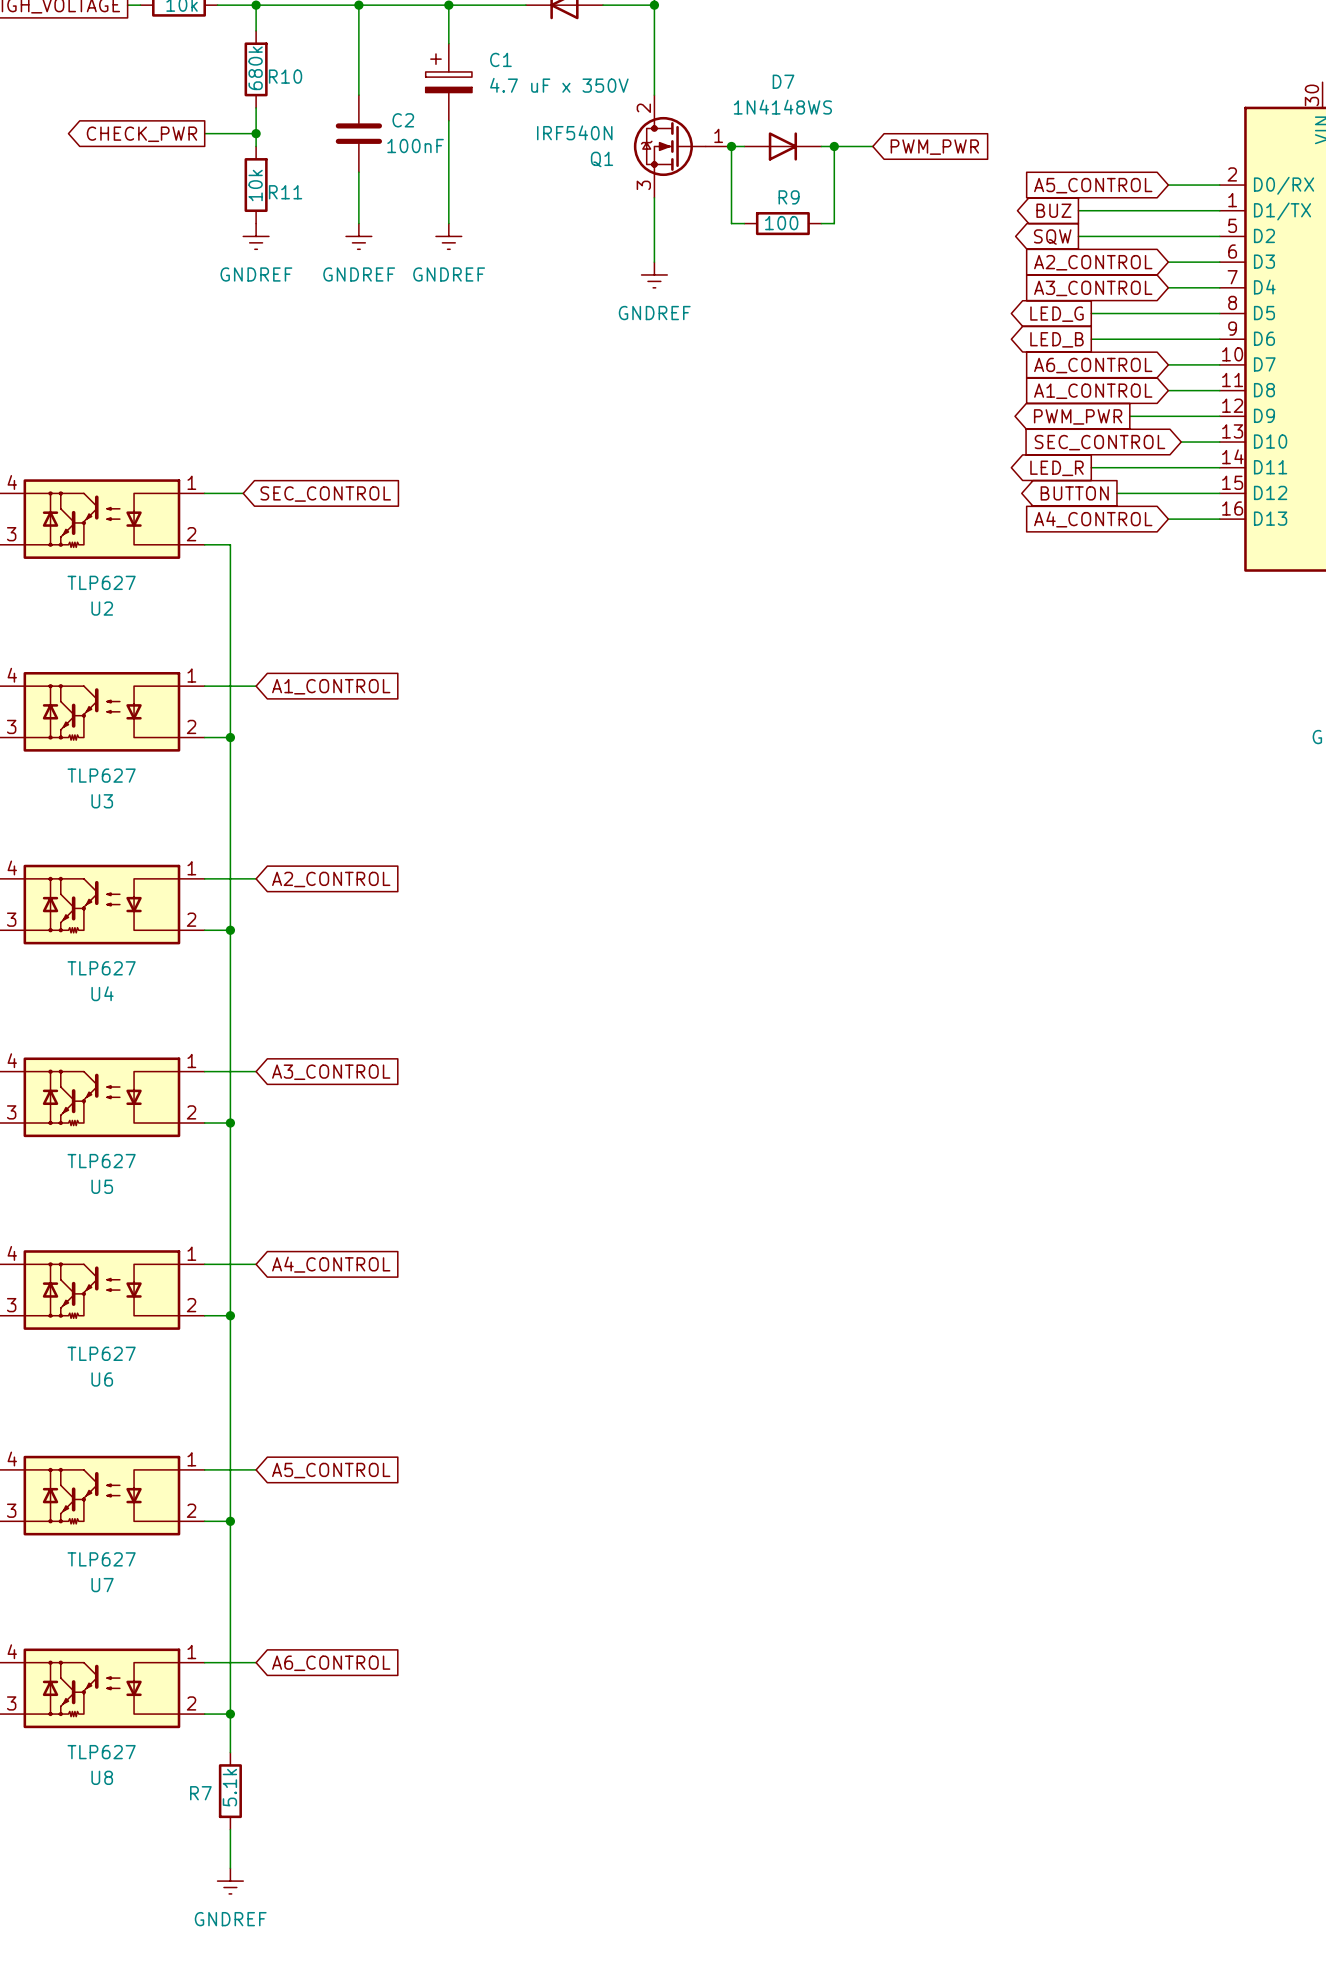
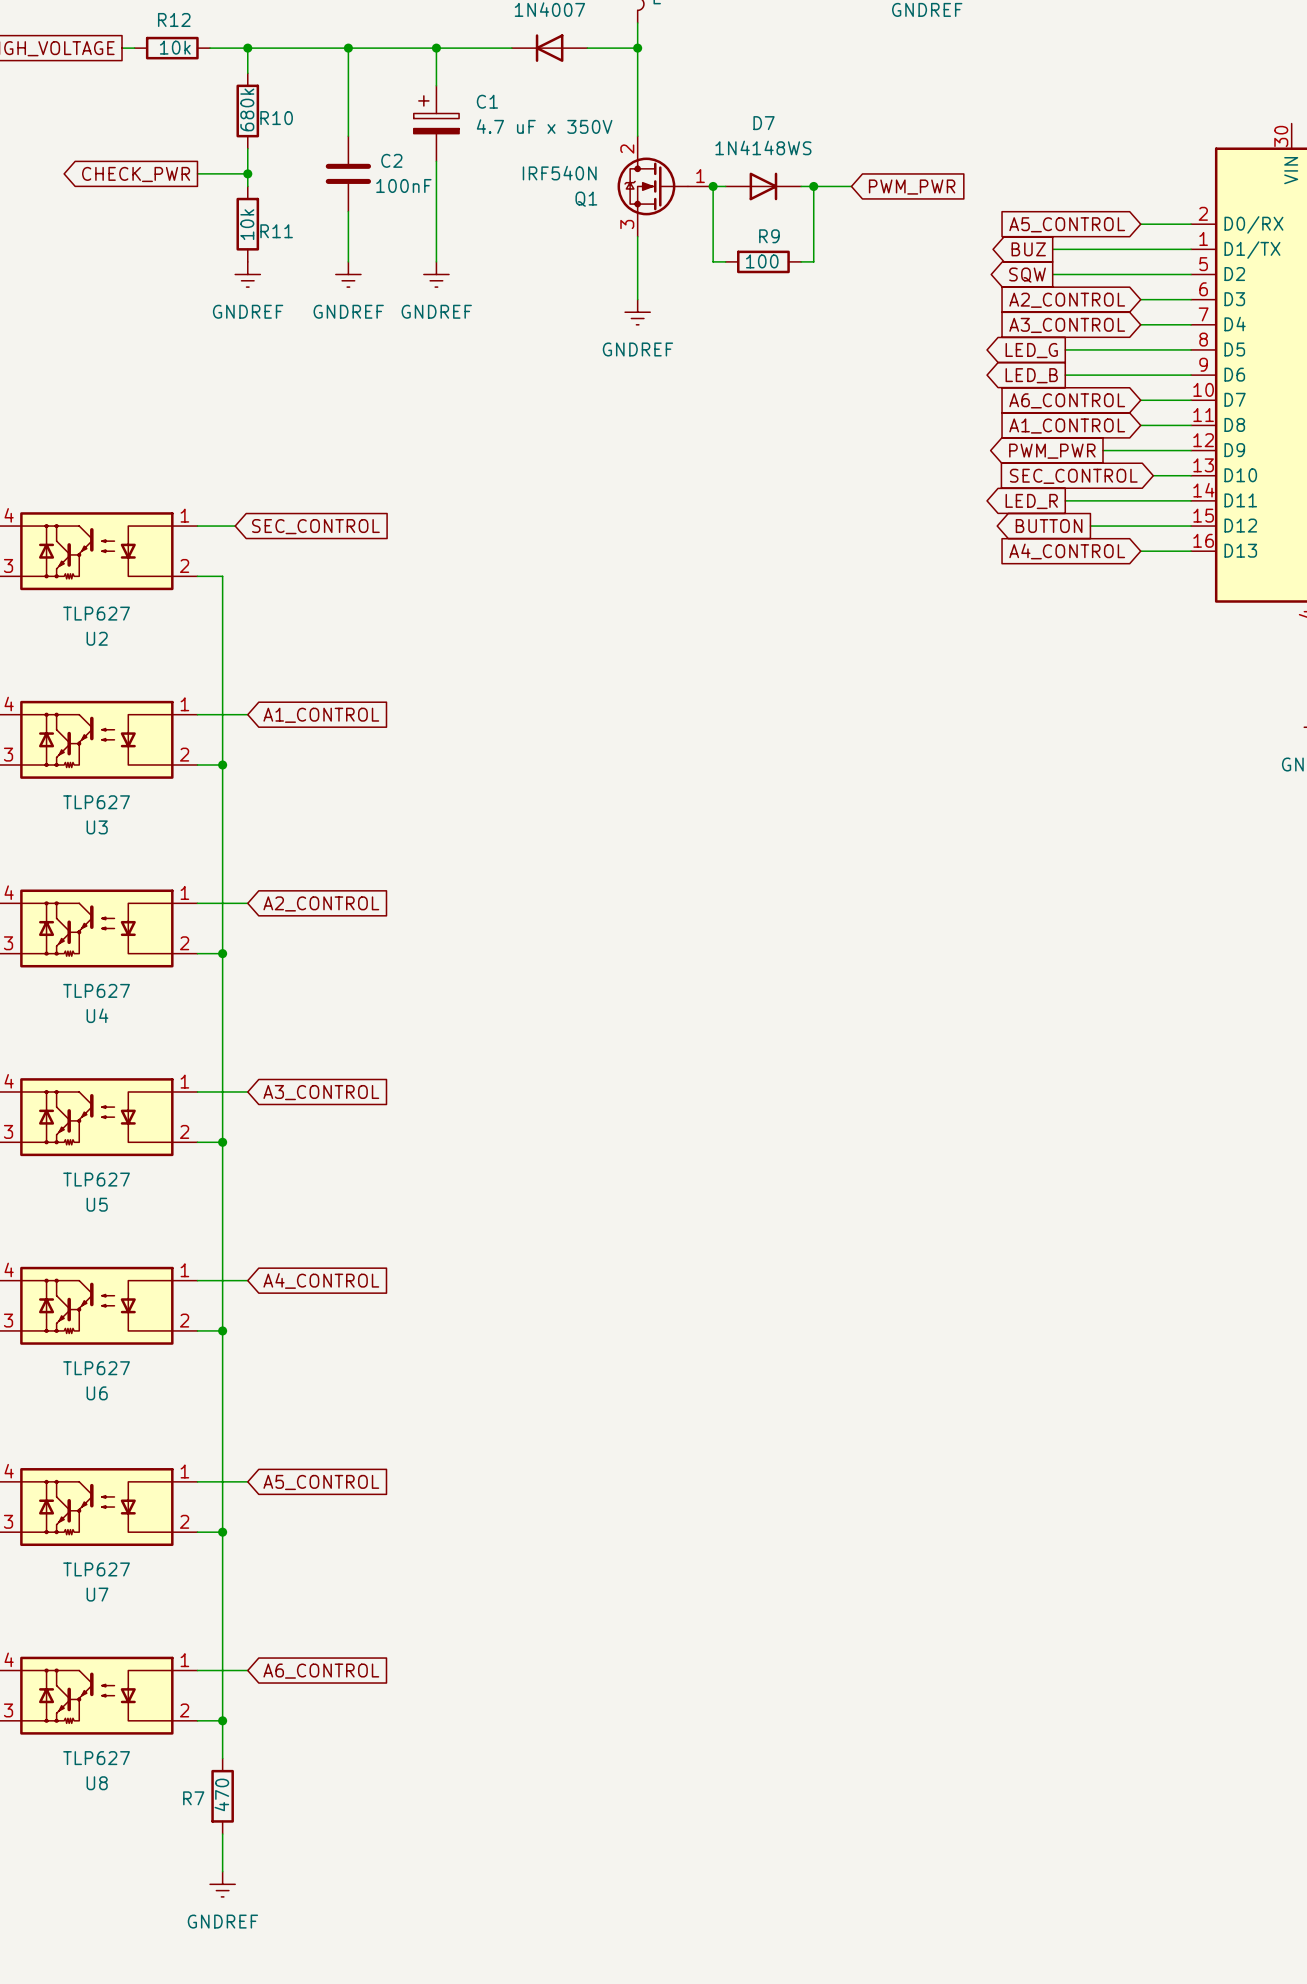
R7 value: 5.1k (229, 1787) -> 470 (221, 1794)

